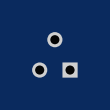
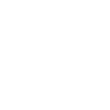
part: (54, 54) -> none

